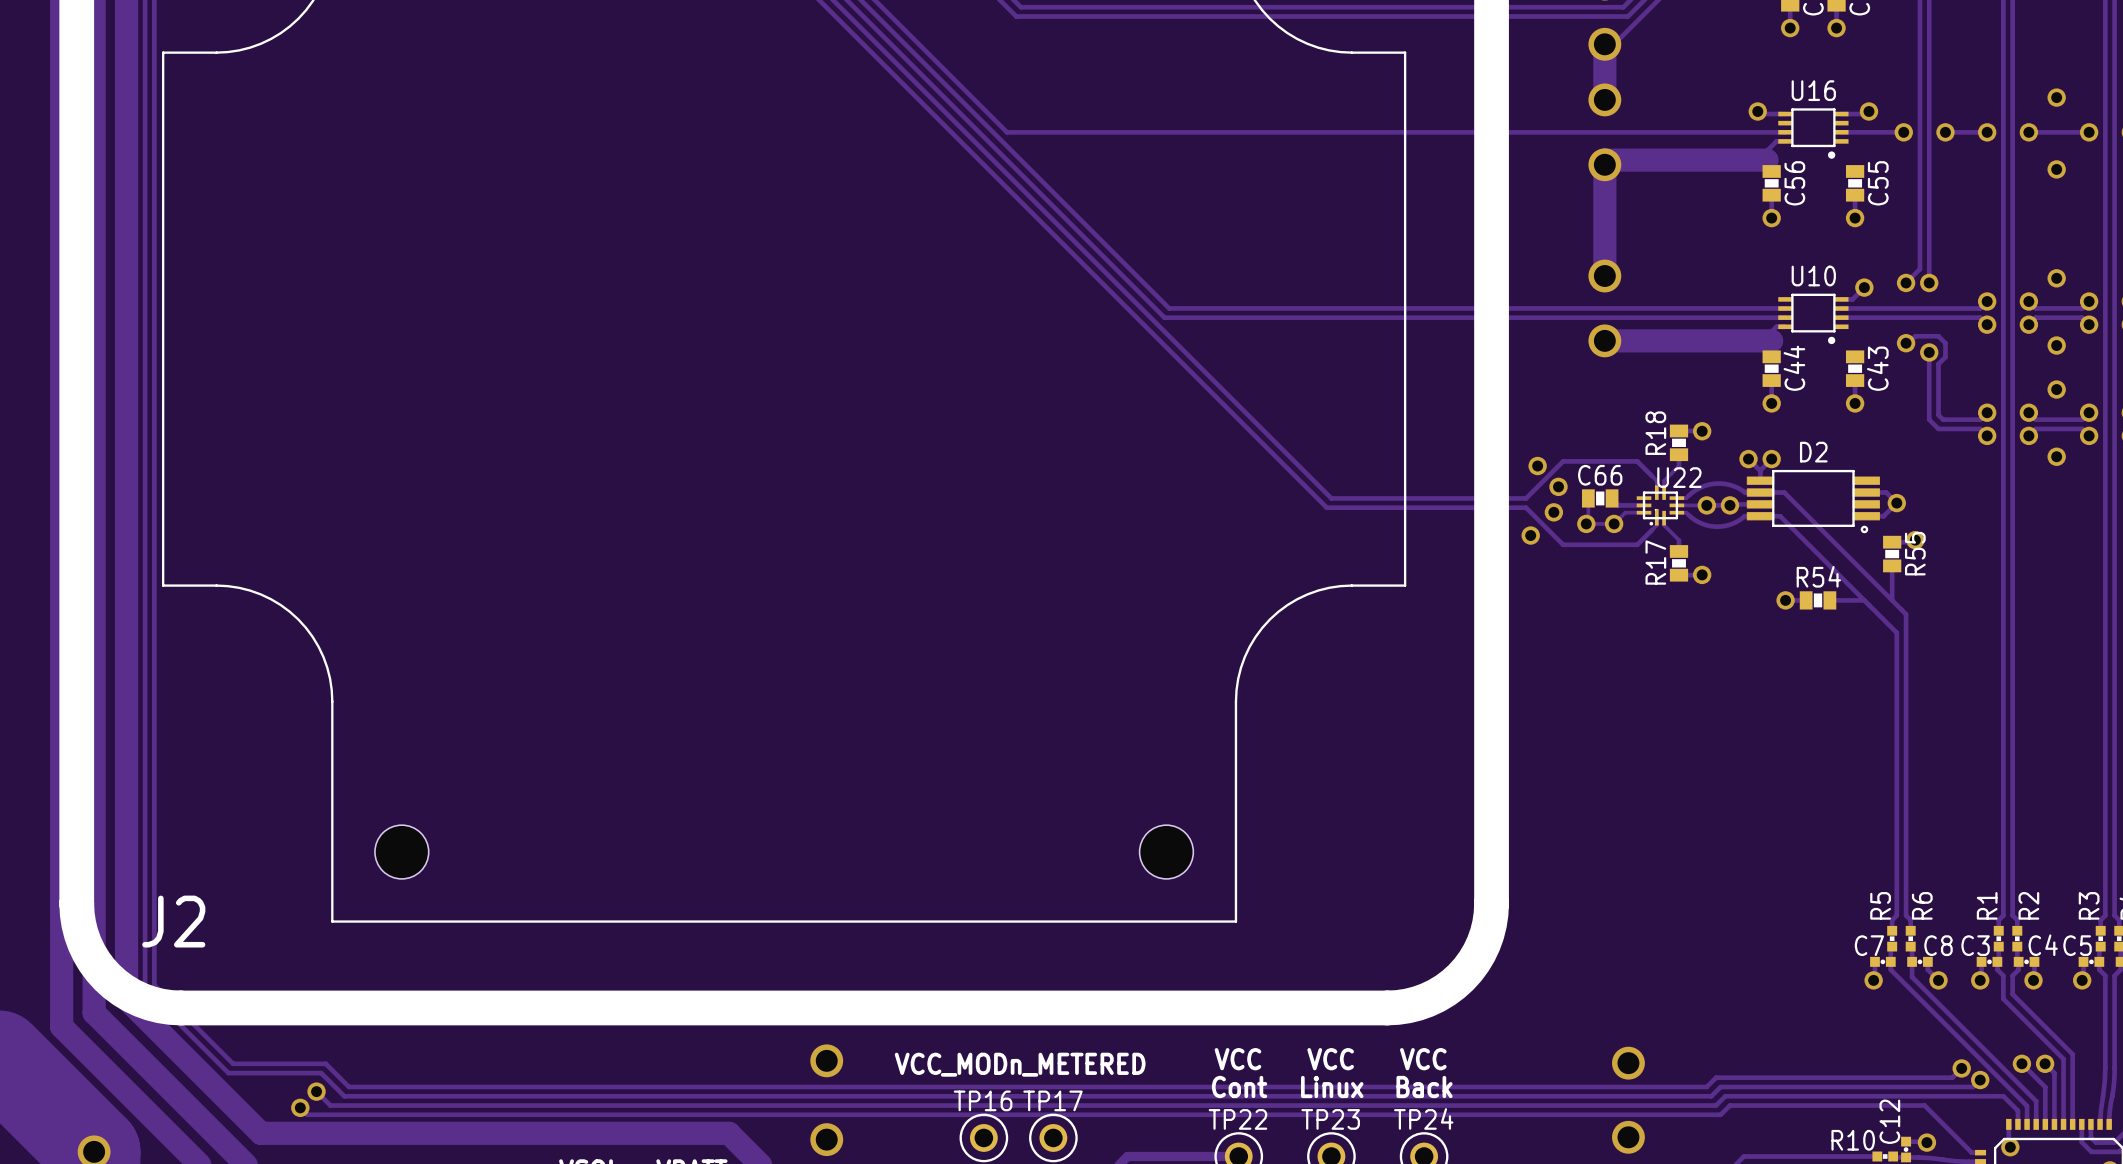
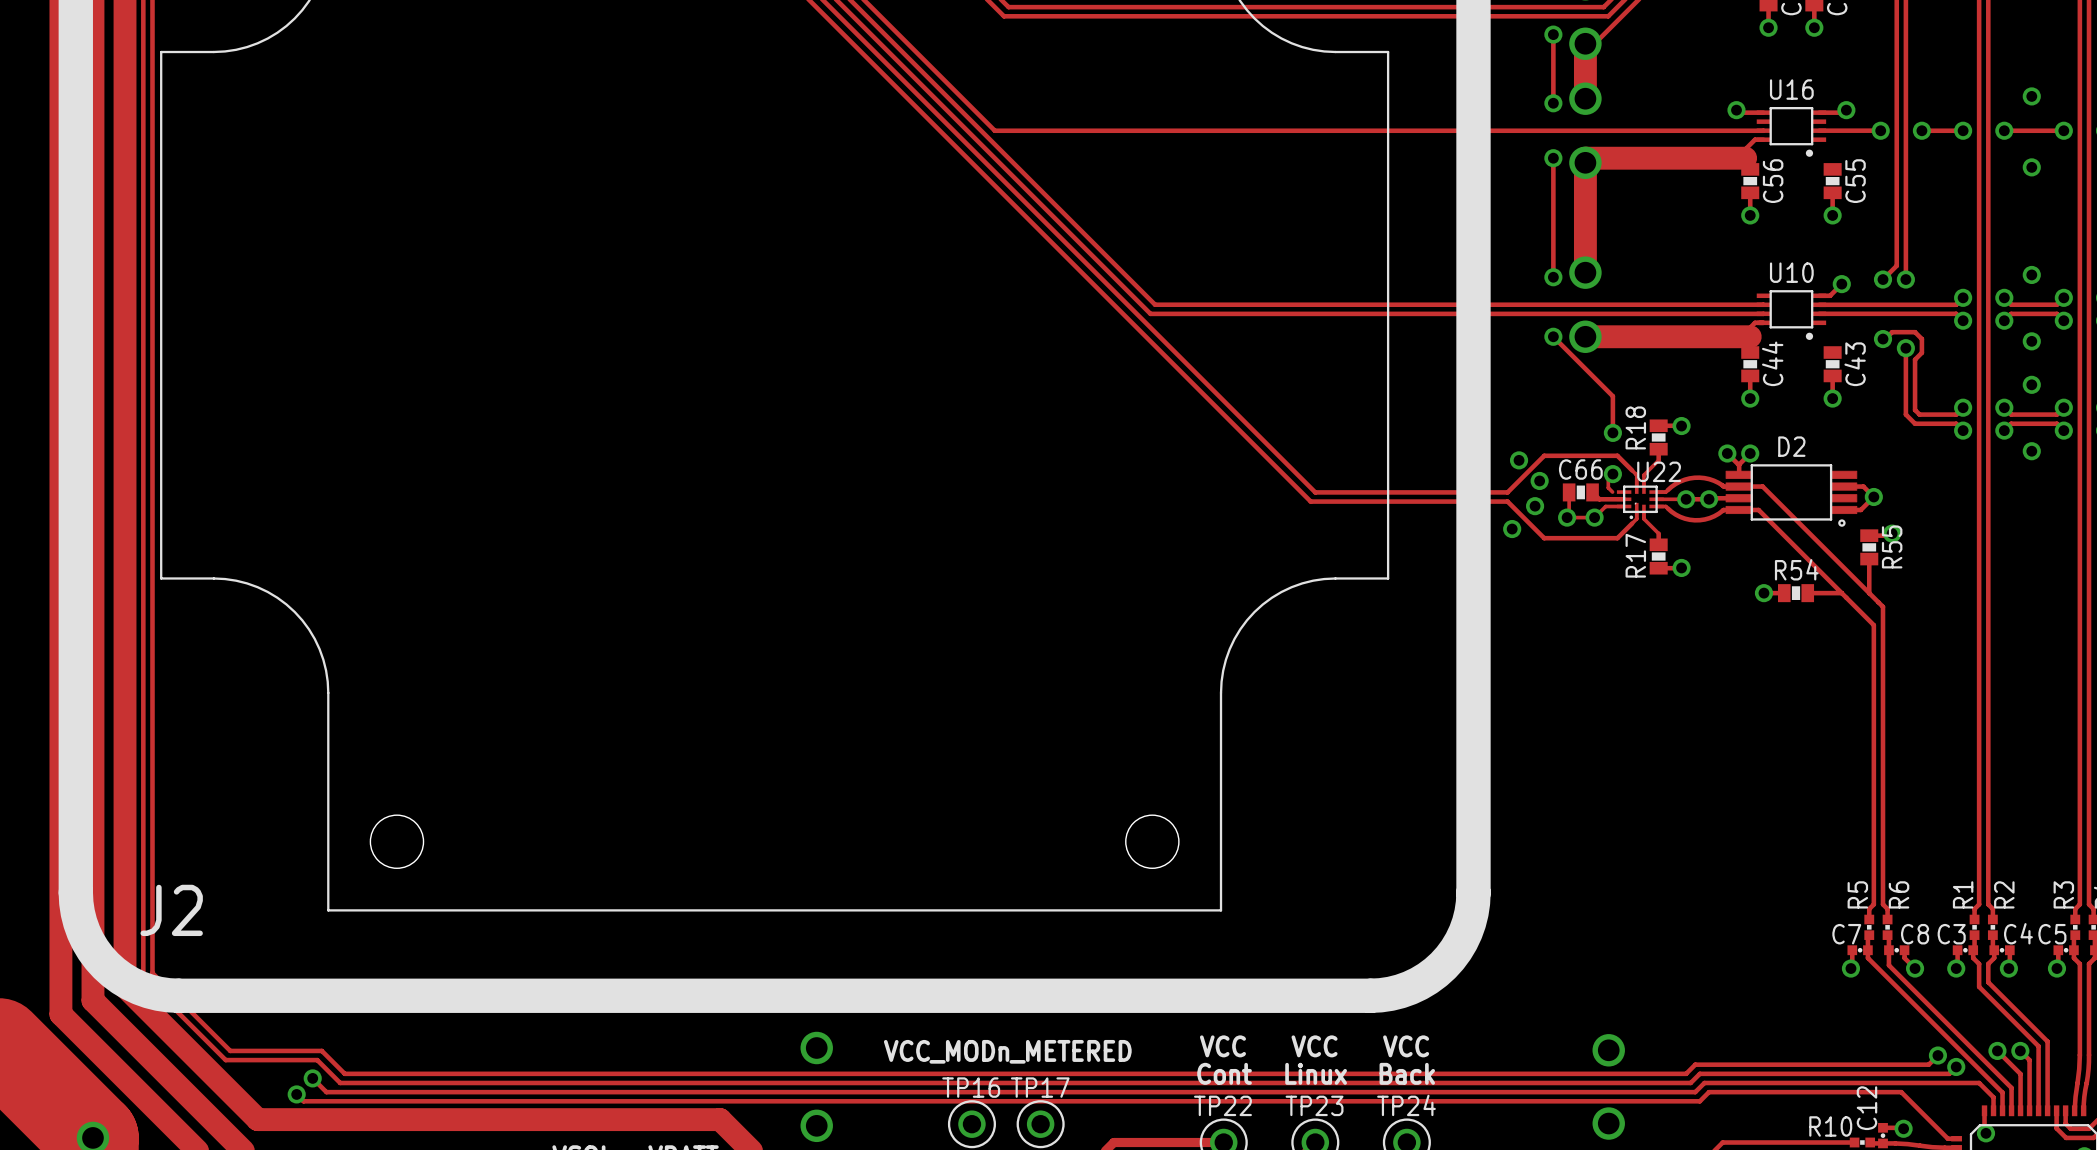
track: none -> (1553, 34) (1553, 103)
via: none -> (1553, 34)
via: none -> (1553, 103)
track: none -> (1553, 158) (1553, 277)
via: none -> (1553, 158)
via: none -> (1553, 277)
track: none -> (1553, 336) (1612, 396) (1612, 432)
via: none -> (1553, 336)
via: none -> (1612, 432)
track: none -> (1612, 474) (1608, 478) (1608, 487) (1612, 492)
via: none -> (1612, 474)

